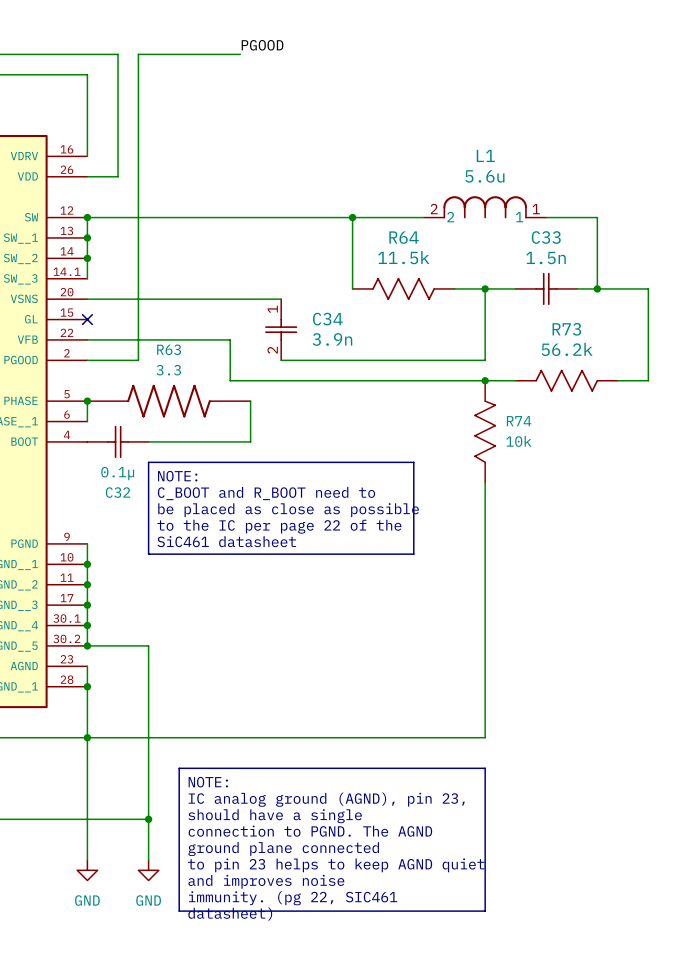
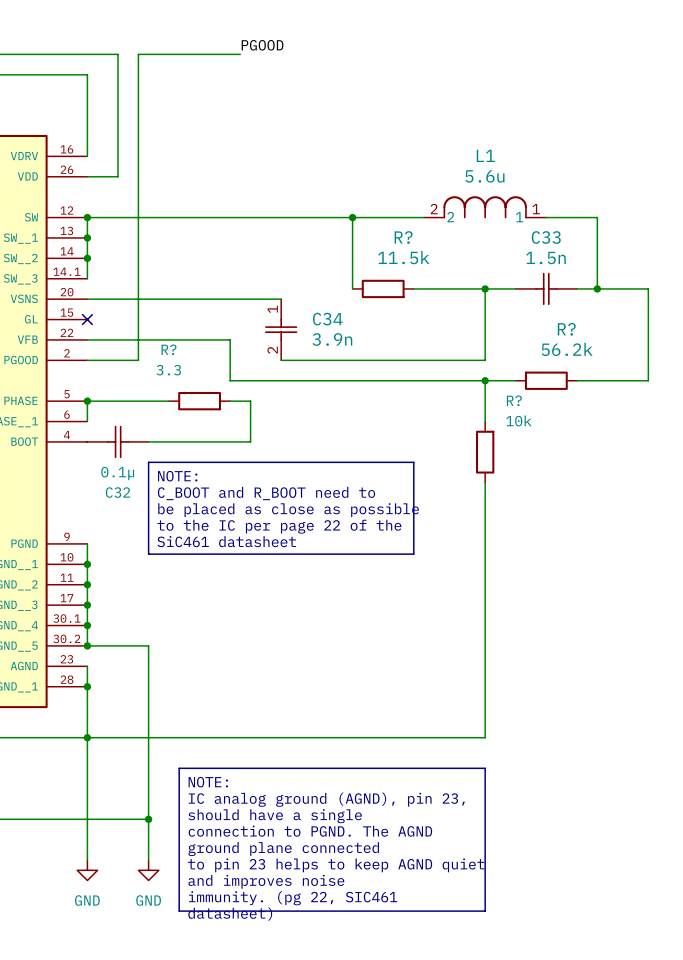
R?: none -> 11.5k (383, 288)
R64: 11.5k (403, 288) -> none
R?: none -> 56.2k (546, 380)
R73: 56.2k (566, 380) -> none
R63: 3.3 (169, 401) -> none
R?: none -> 3.3 (199, 401)
R74: 10k (485, 431) -> none
R?: none -> 10k (485, 452)

